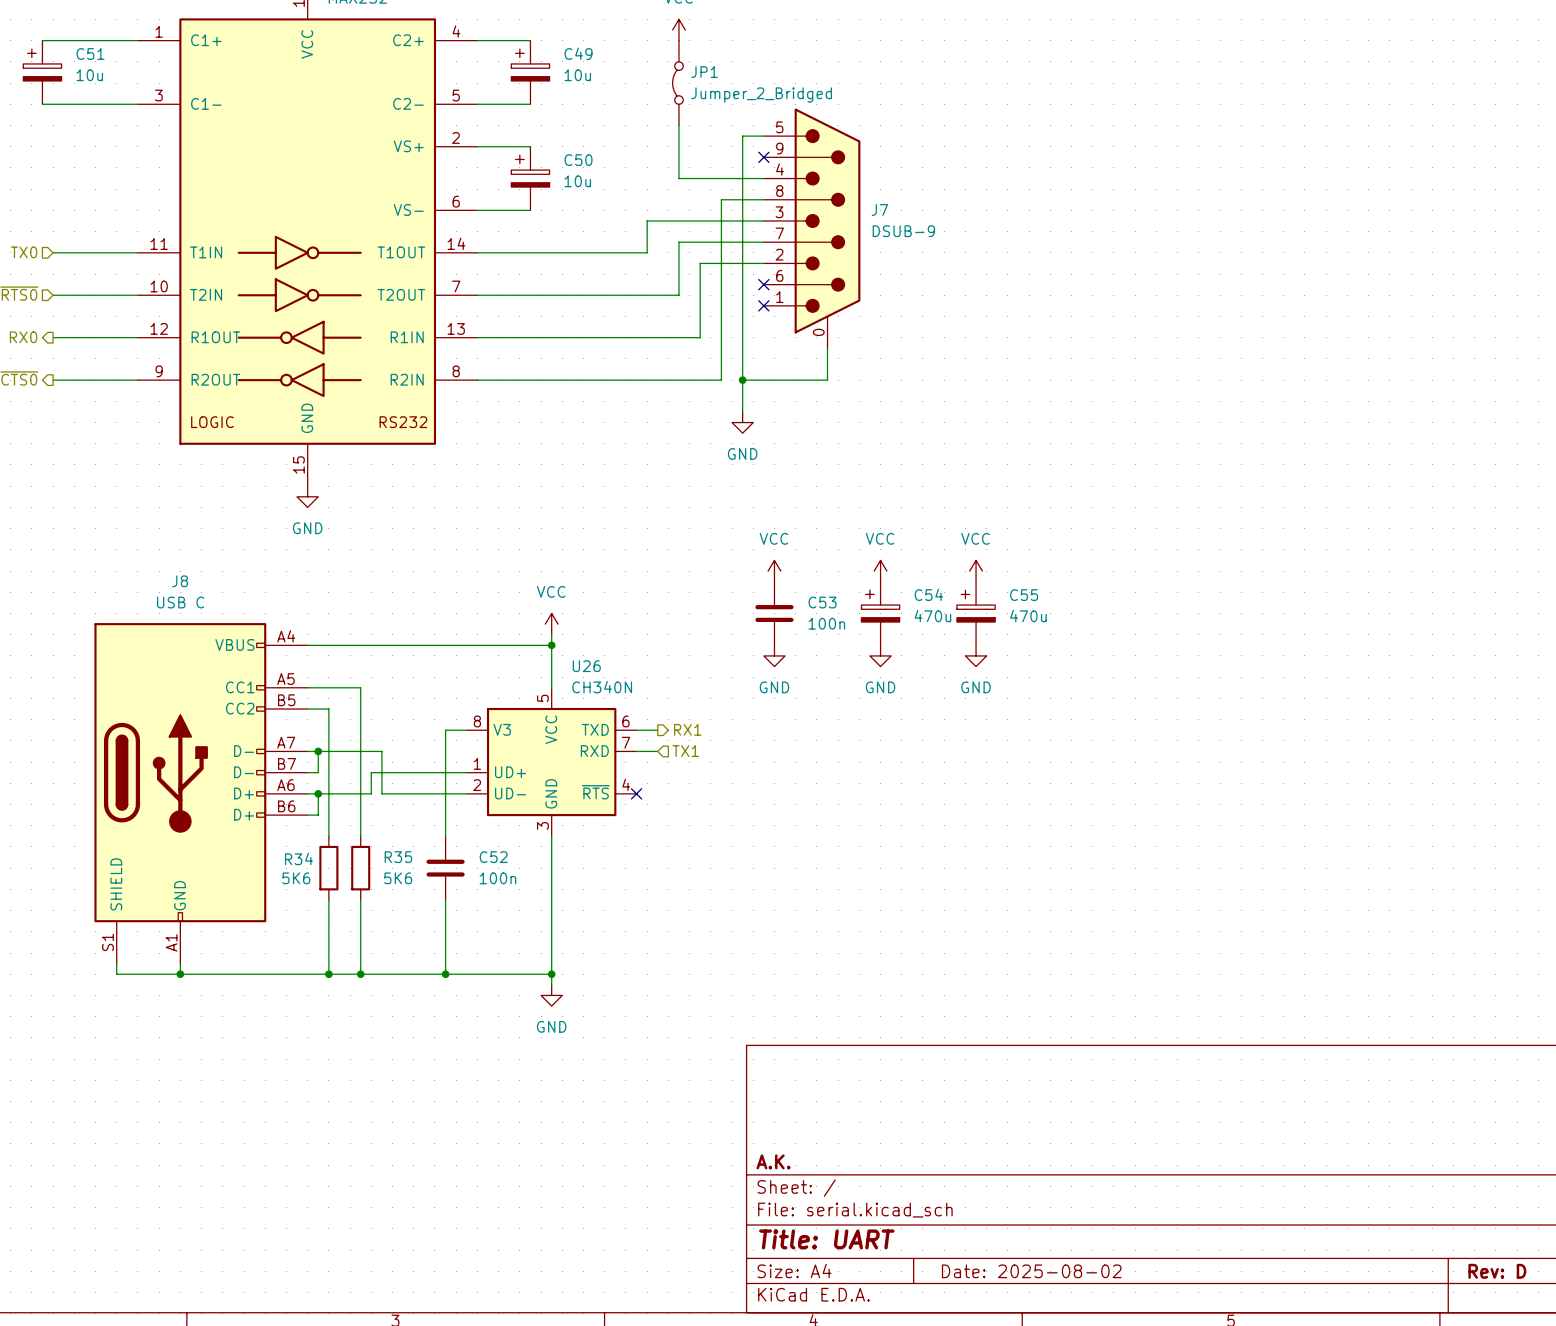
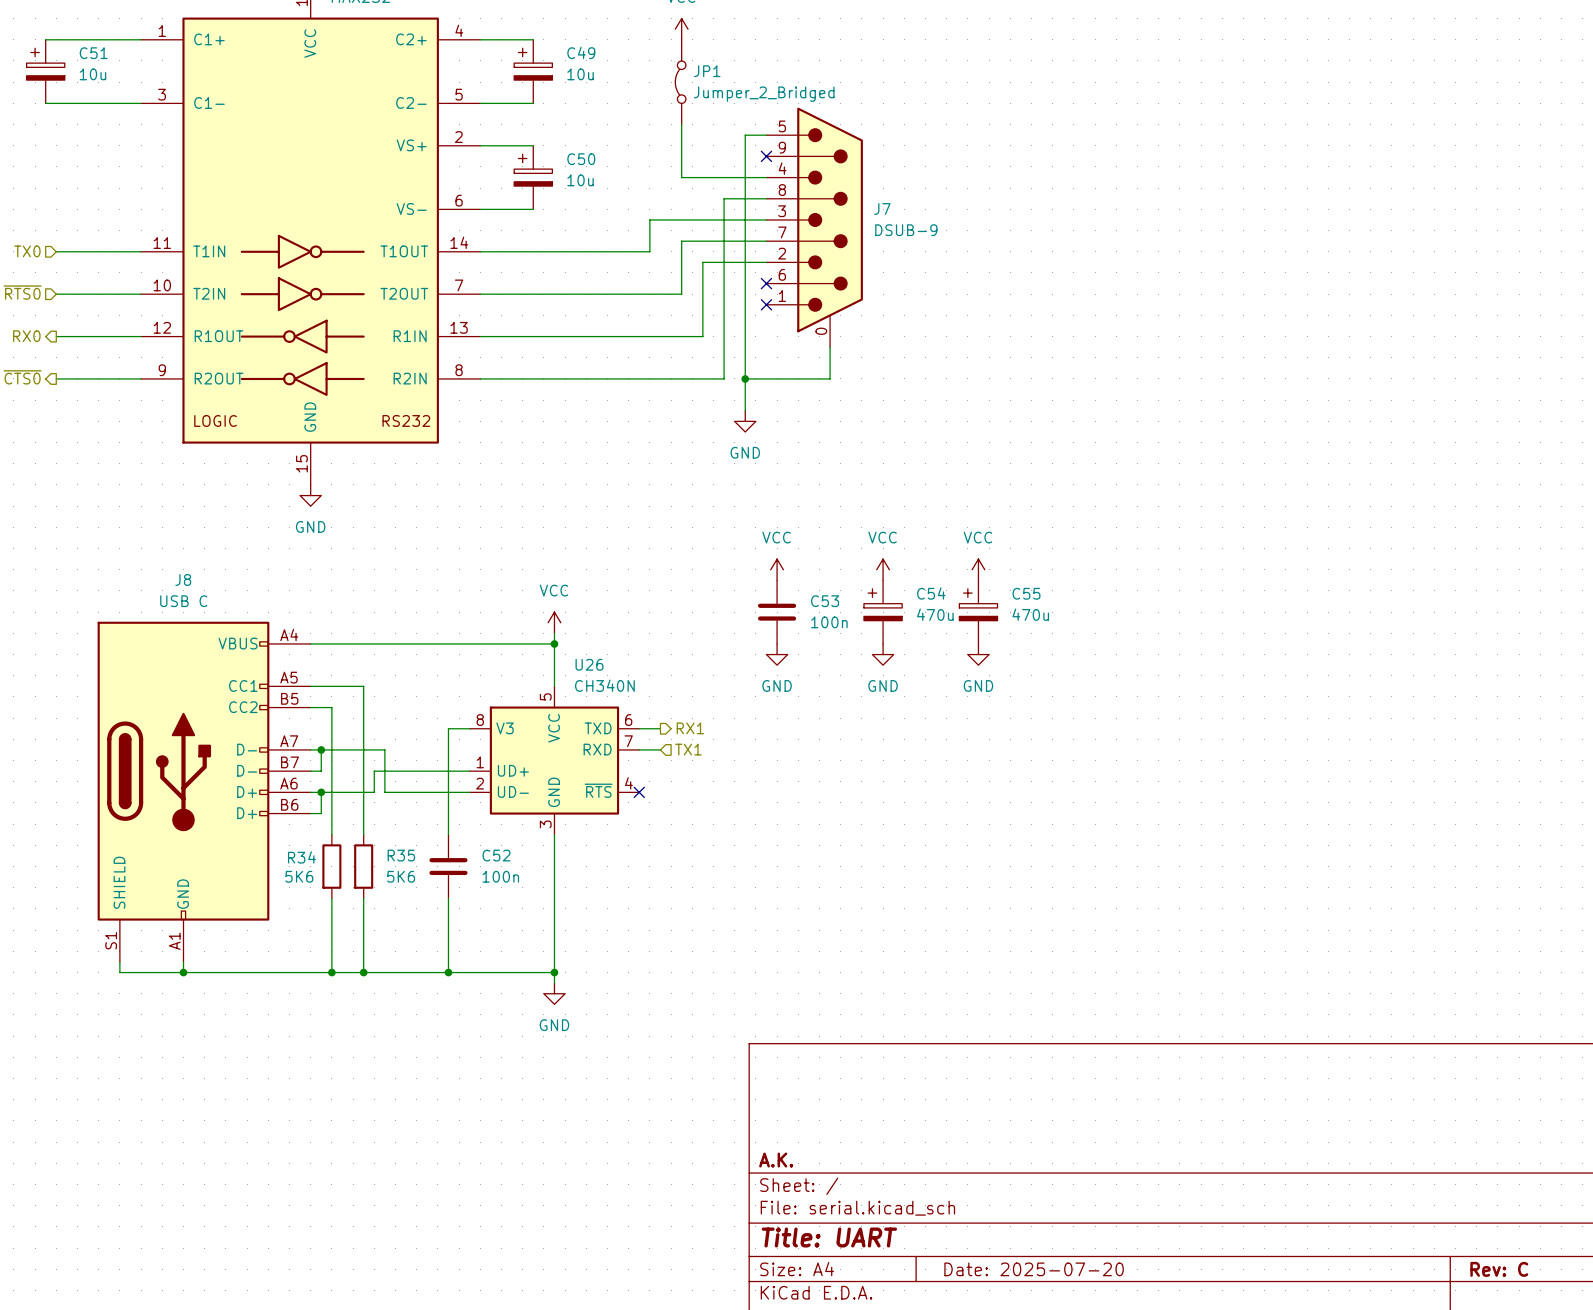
title block: Date: 2025-08-02 (1031, 1271) -> Date: 2025-07-20 (1034, 1269)
title block: Rev: D (1497, 1271) -> Rev: C (1499, 1269)

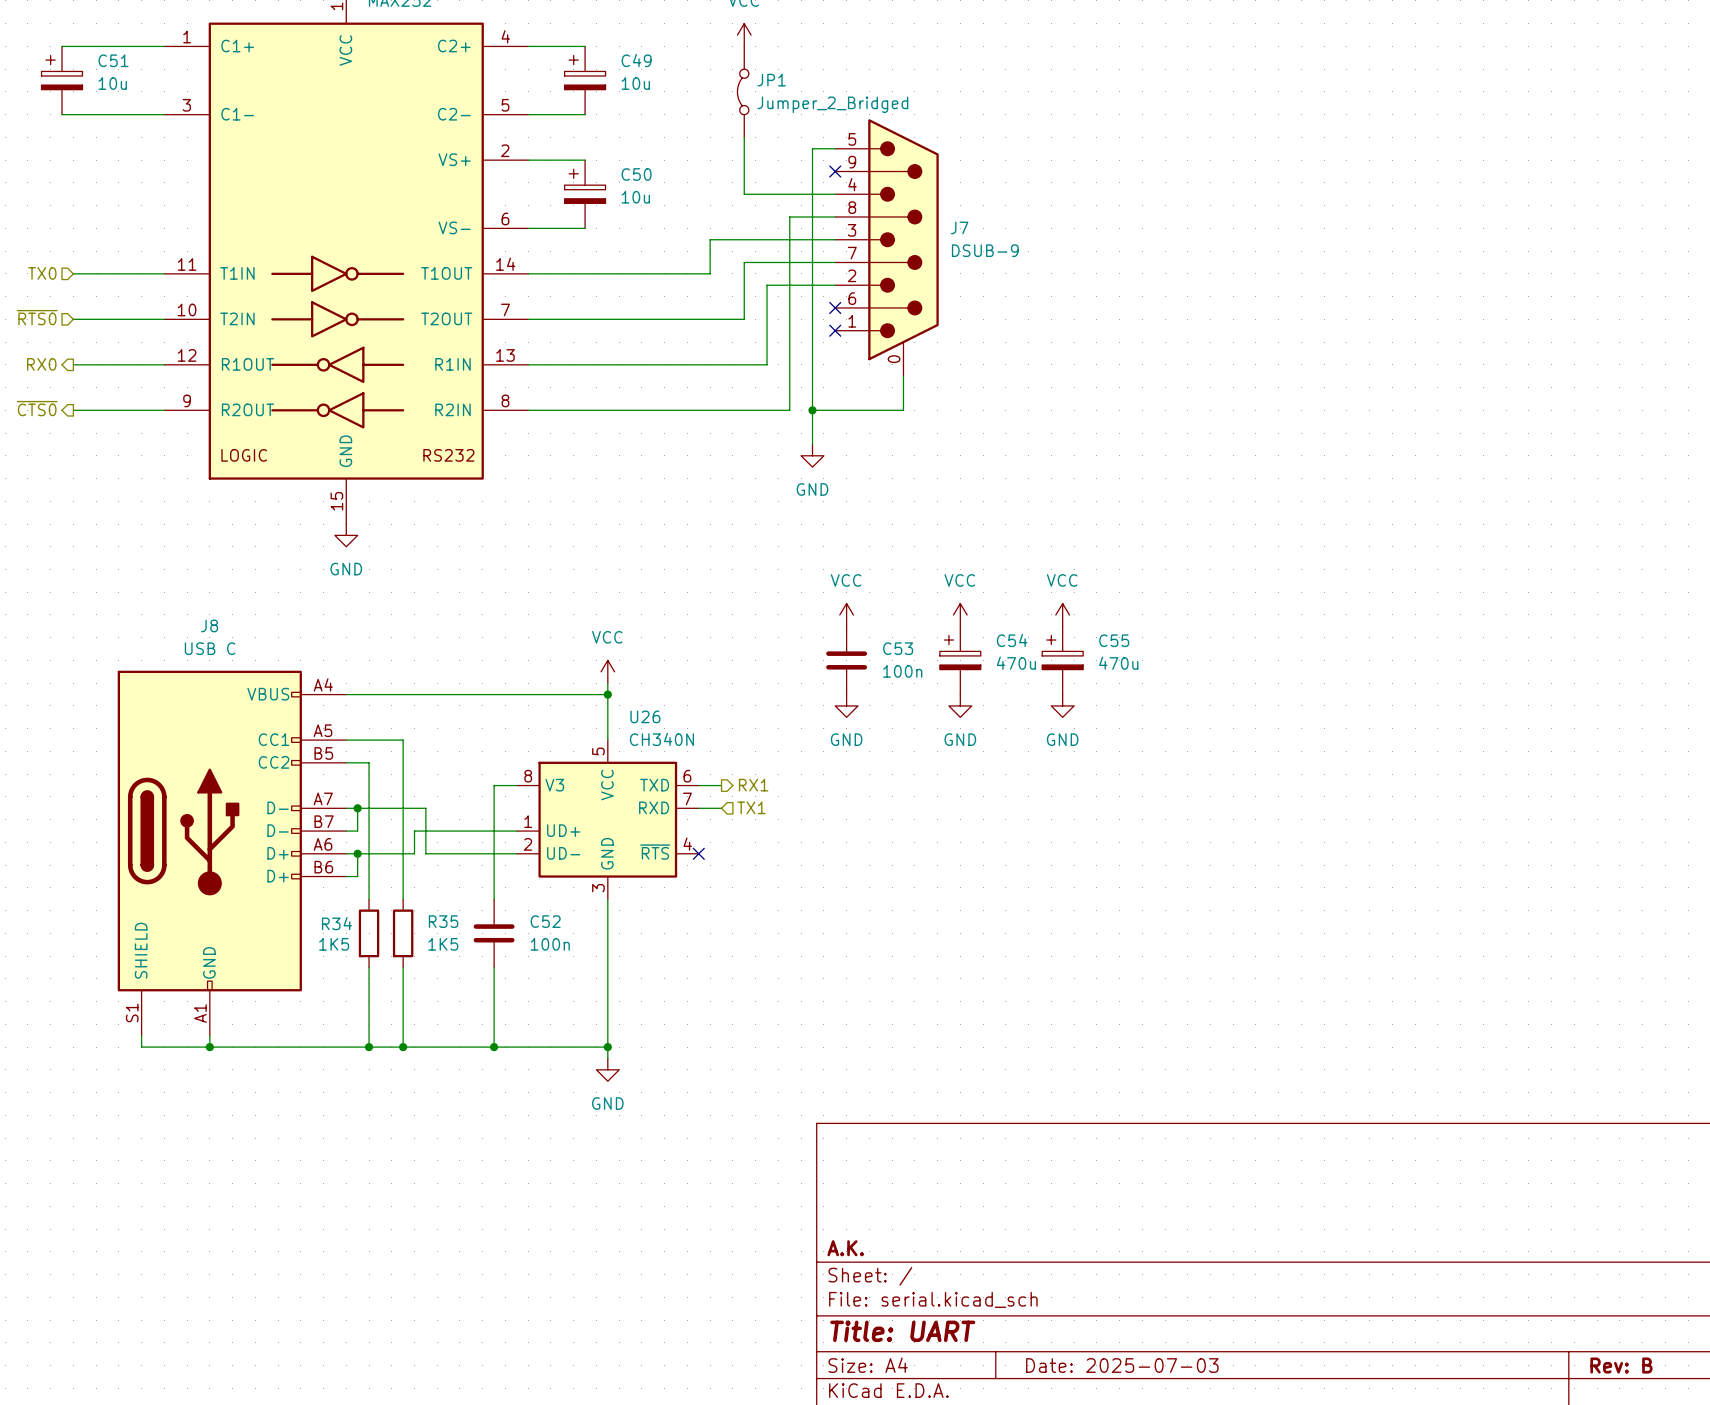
R34 value: 5K6 (299, 876) -> 1K5 (334, 944)
R35 value: 5K6 (401, 876) -> 1K5 (443, 944)
title block: Date: 2025-07-20 (1034, 1269) -> Date: 2025-07-03 (1122, 1365)
title block: Rev: C (1499, 1269) -> Rev: B (1621, 1365)

